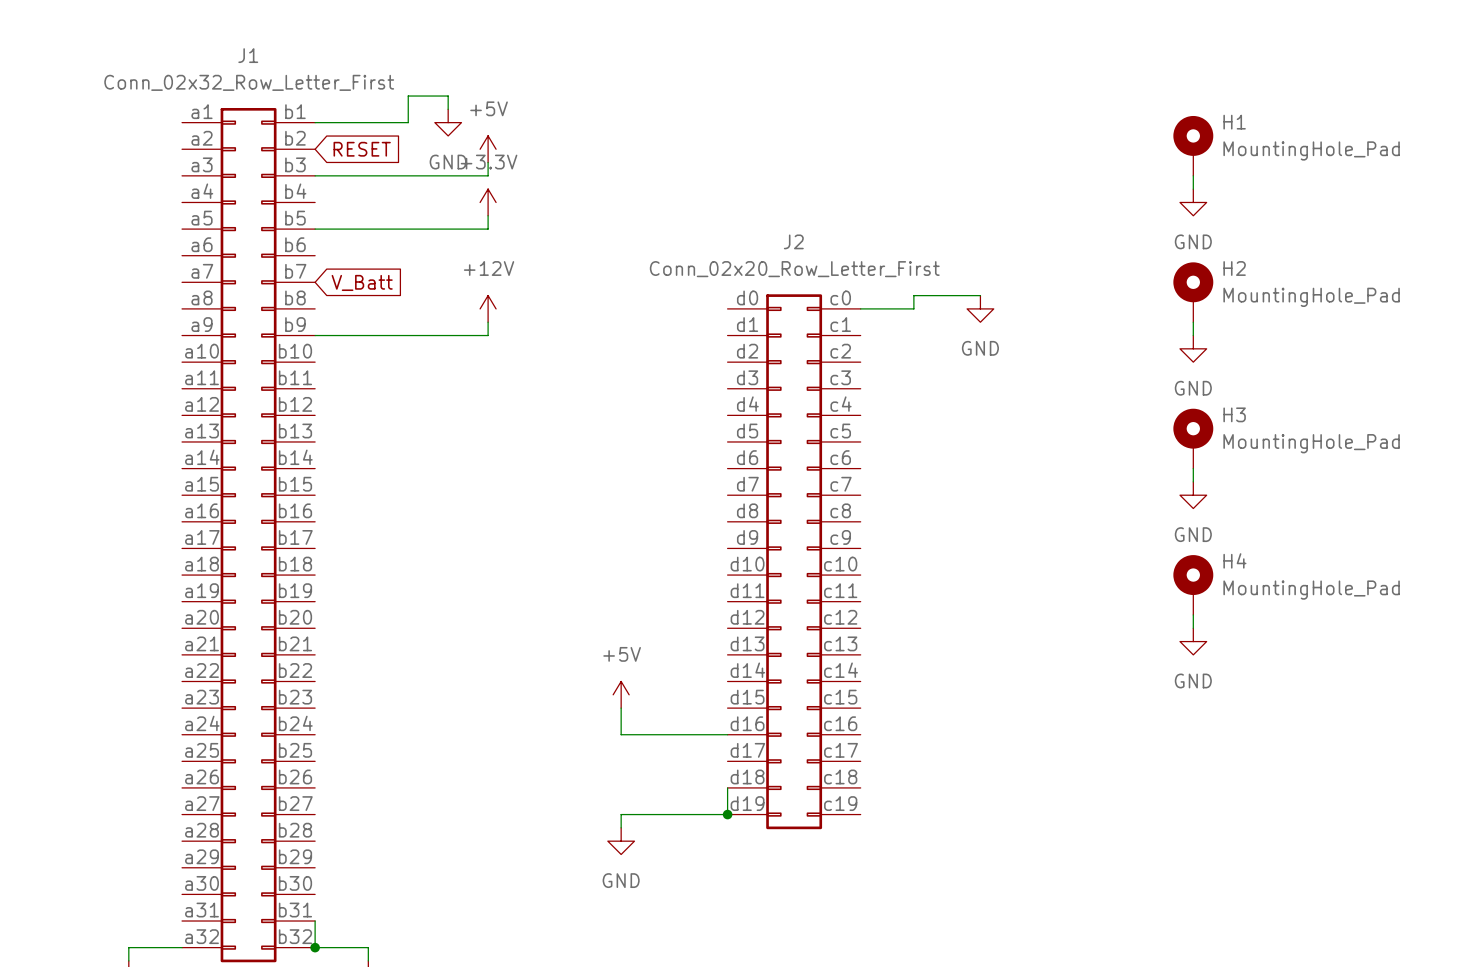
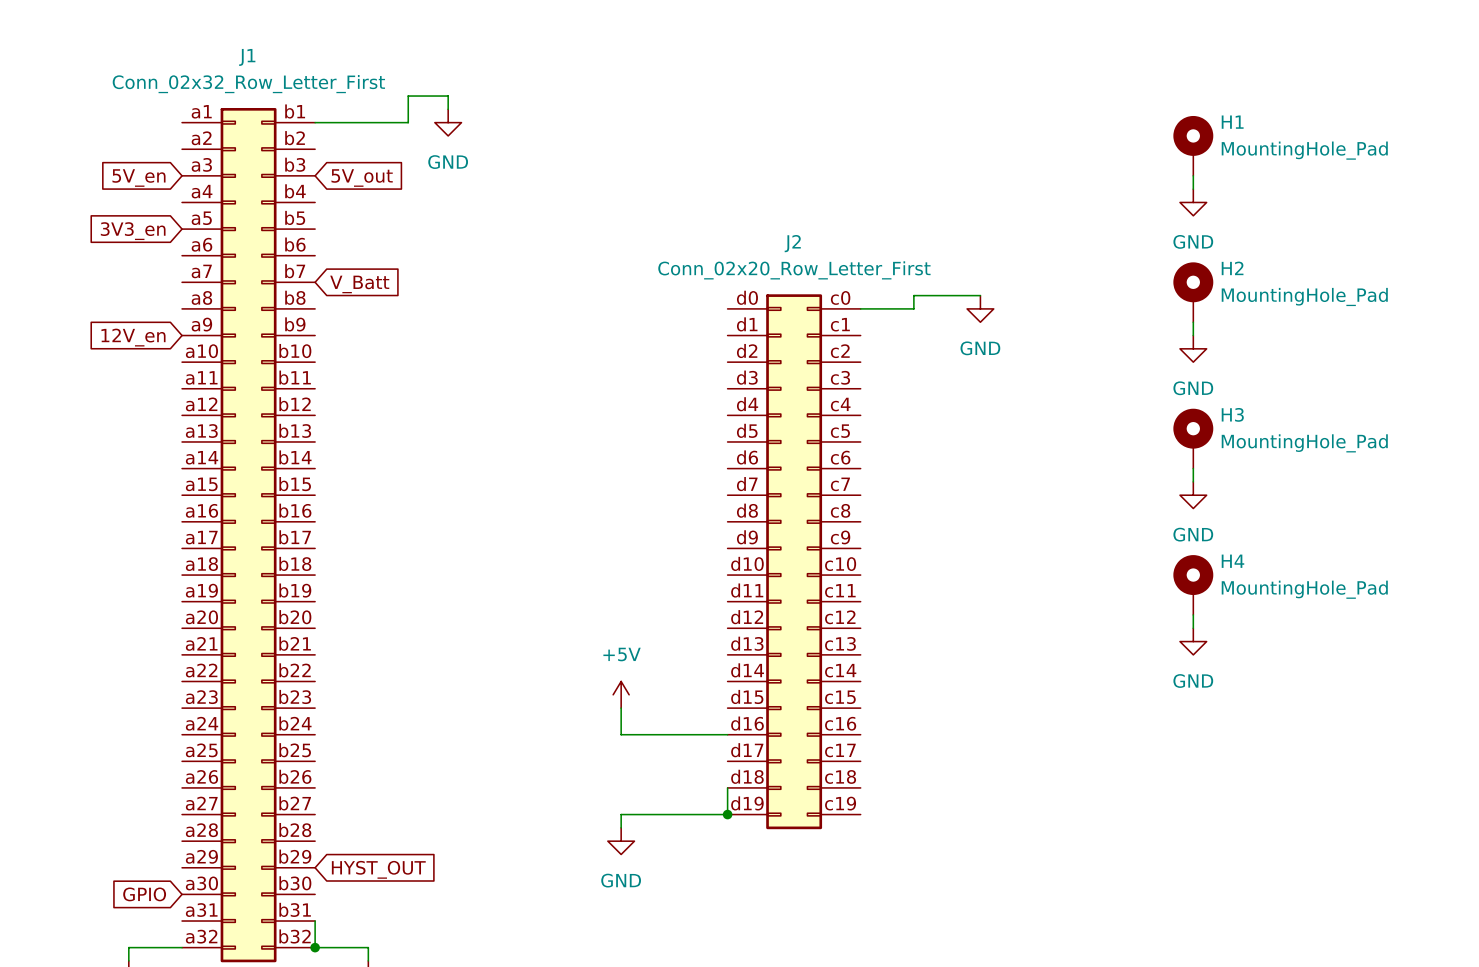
global label: RESET (362, 149) -> none
power symbol: +5V (488, 149) -> none
wire: (488, 162) (488, 175) (315, 175) -> none
global label: none -> 5V_en (138, 178)
global label: none -> 5V_out (362, 178)
power symbol: +3.3V (488, 202) -> none
wire: (488, 215) (488, 229) (315, 229) -> none
global label: none -> 3V3_en (133, 231)
power symbol: +12V (488, 308) -> none
wire: (488, 322) (488, 335) (315, 335) -> none
global label: none -> 12V_en (133, 337)
global label: none -> HYST_OUT (378, 869)
global label: none -> GPIO (144, 894)

